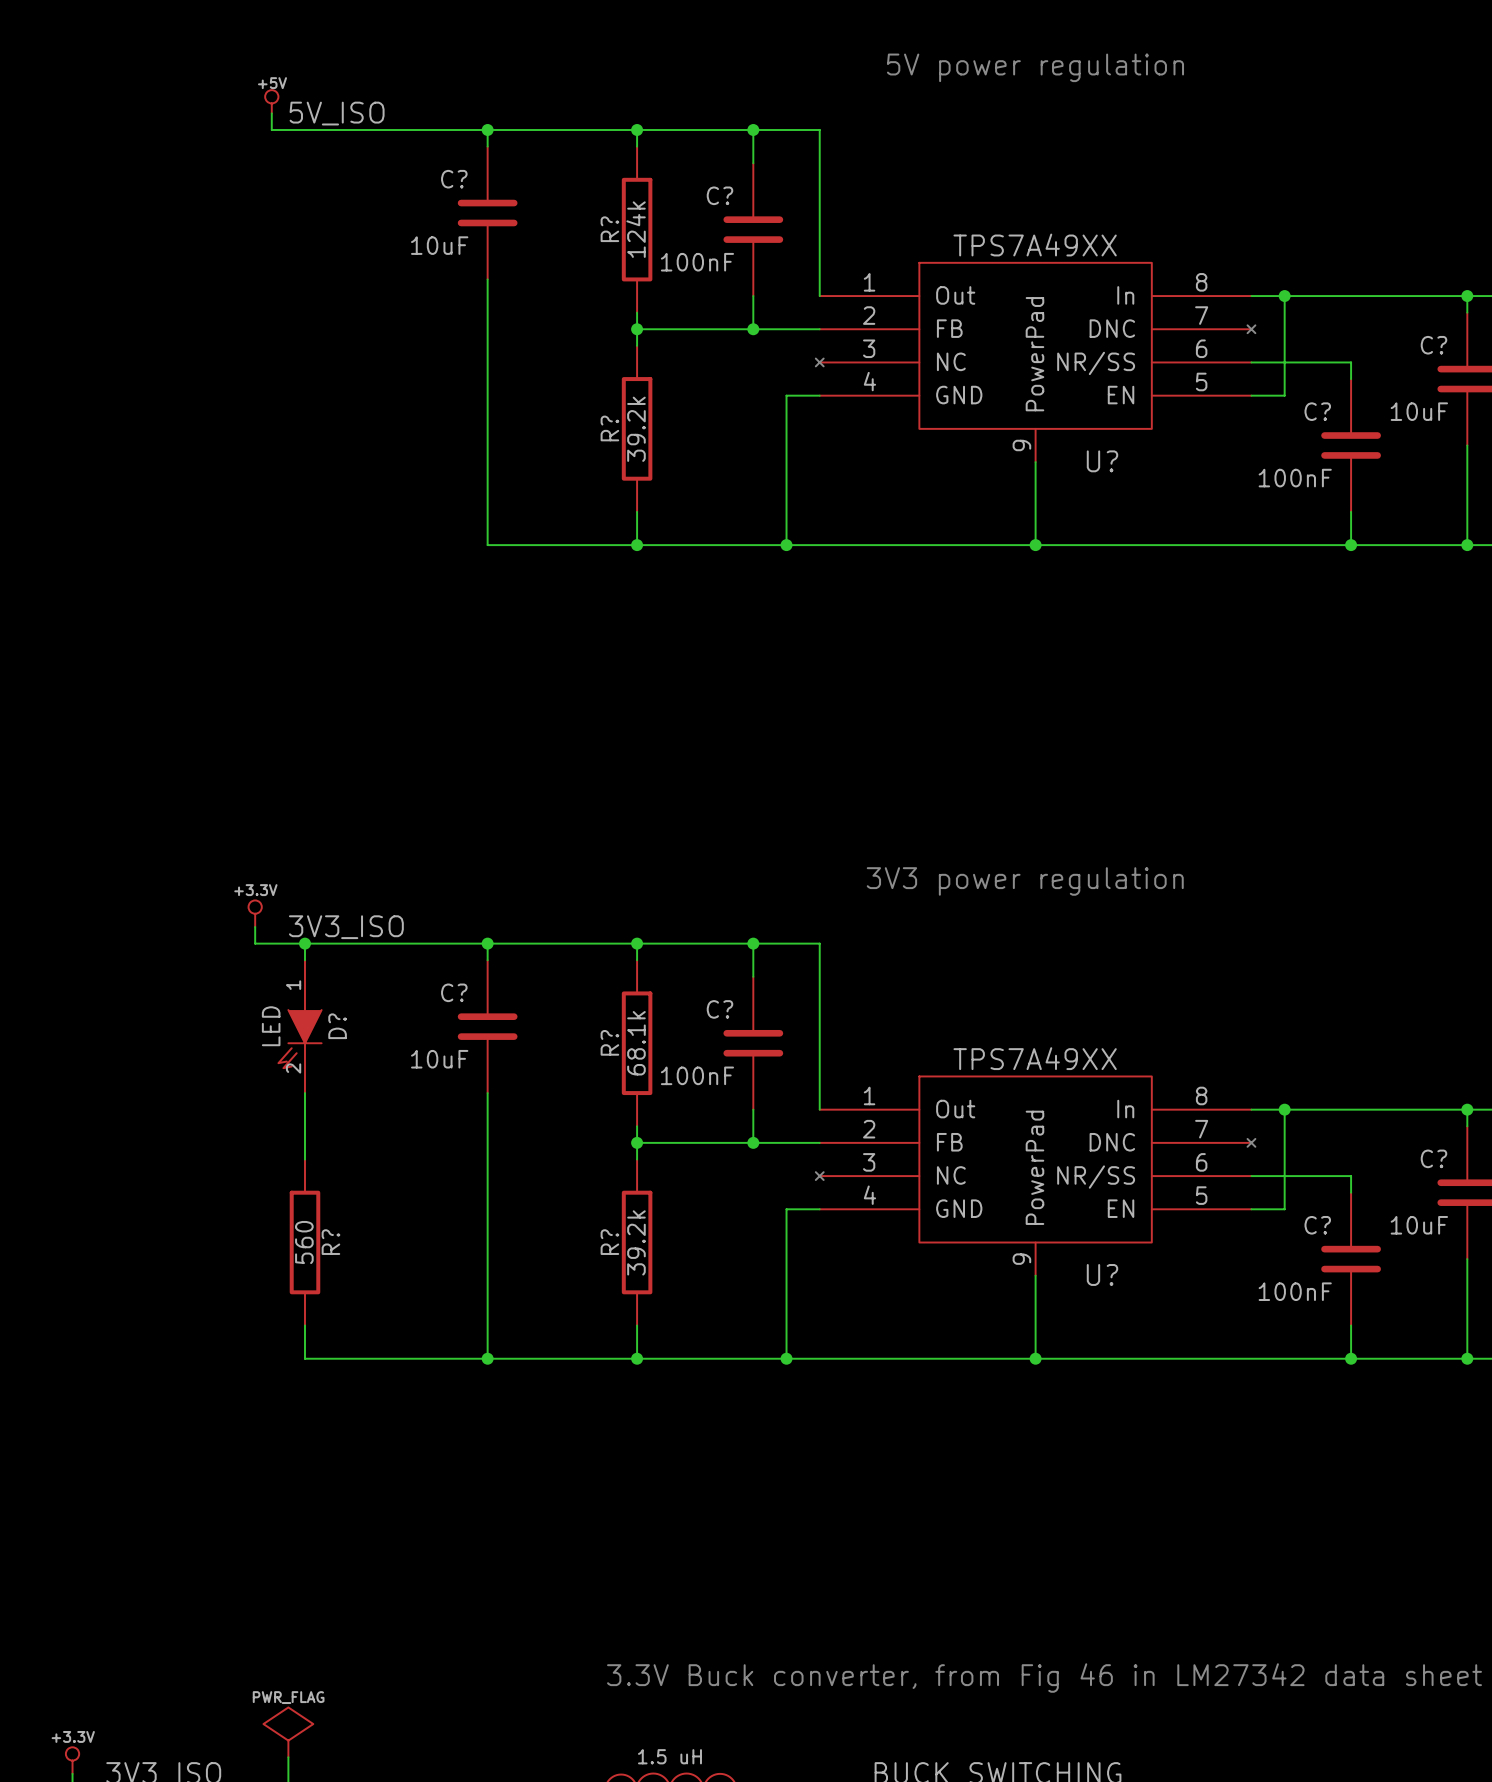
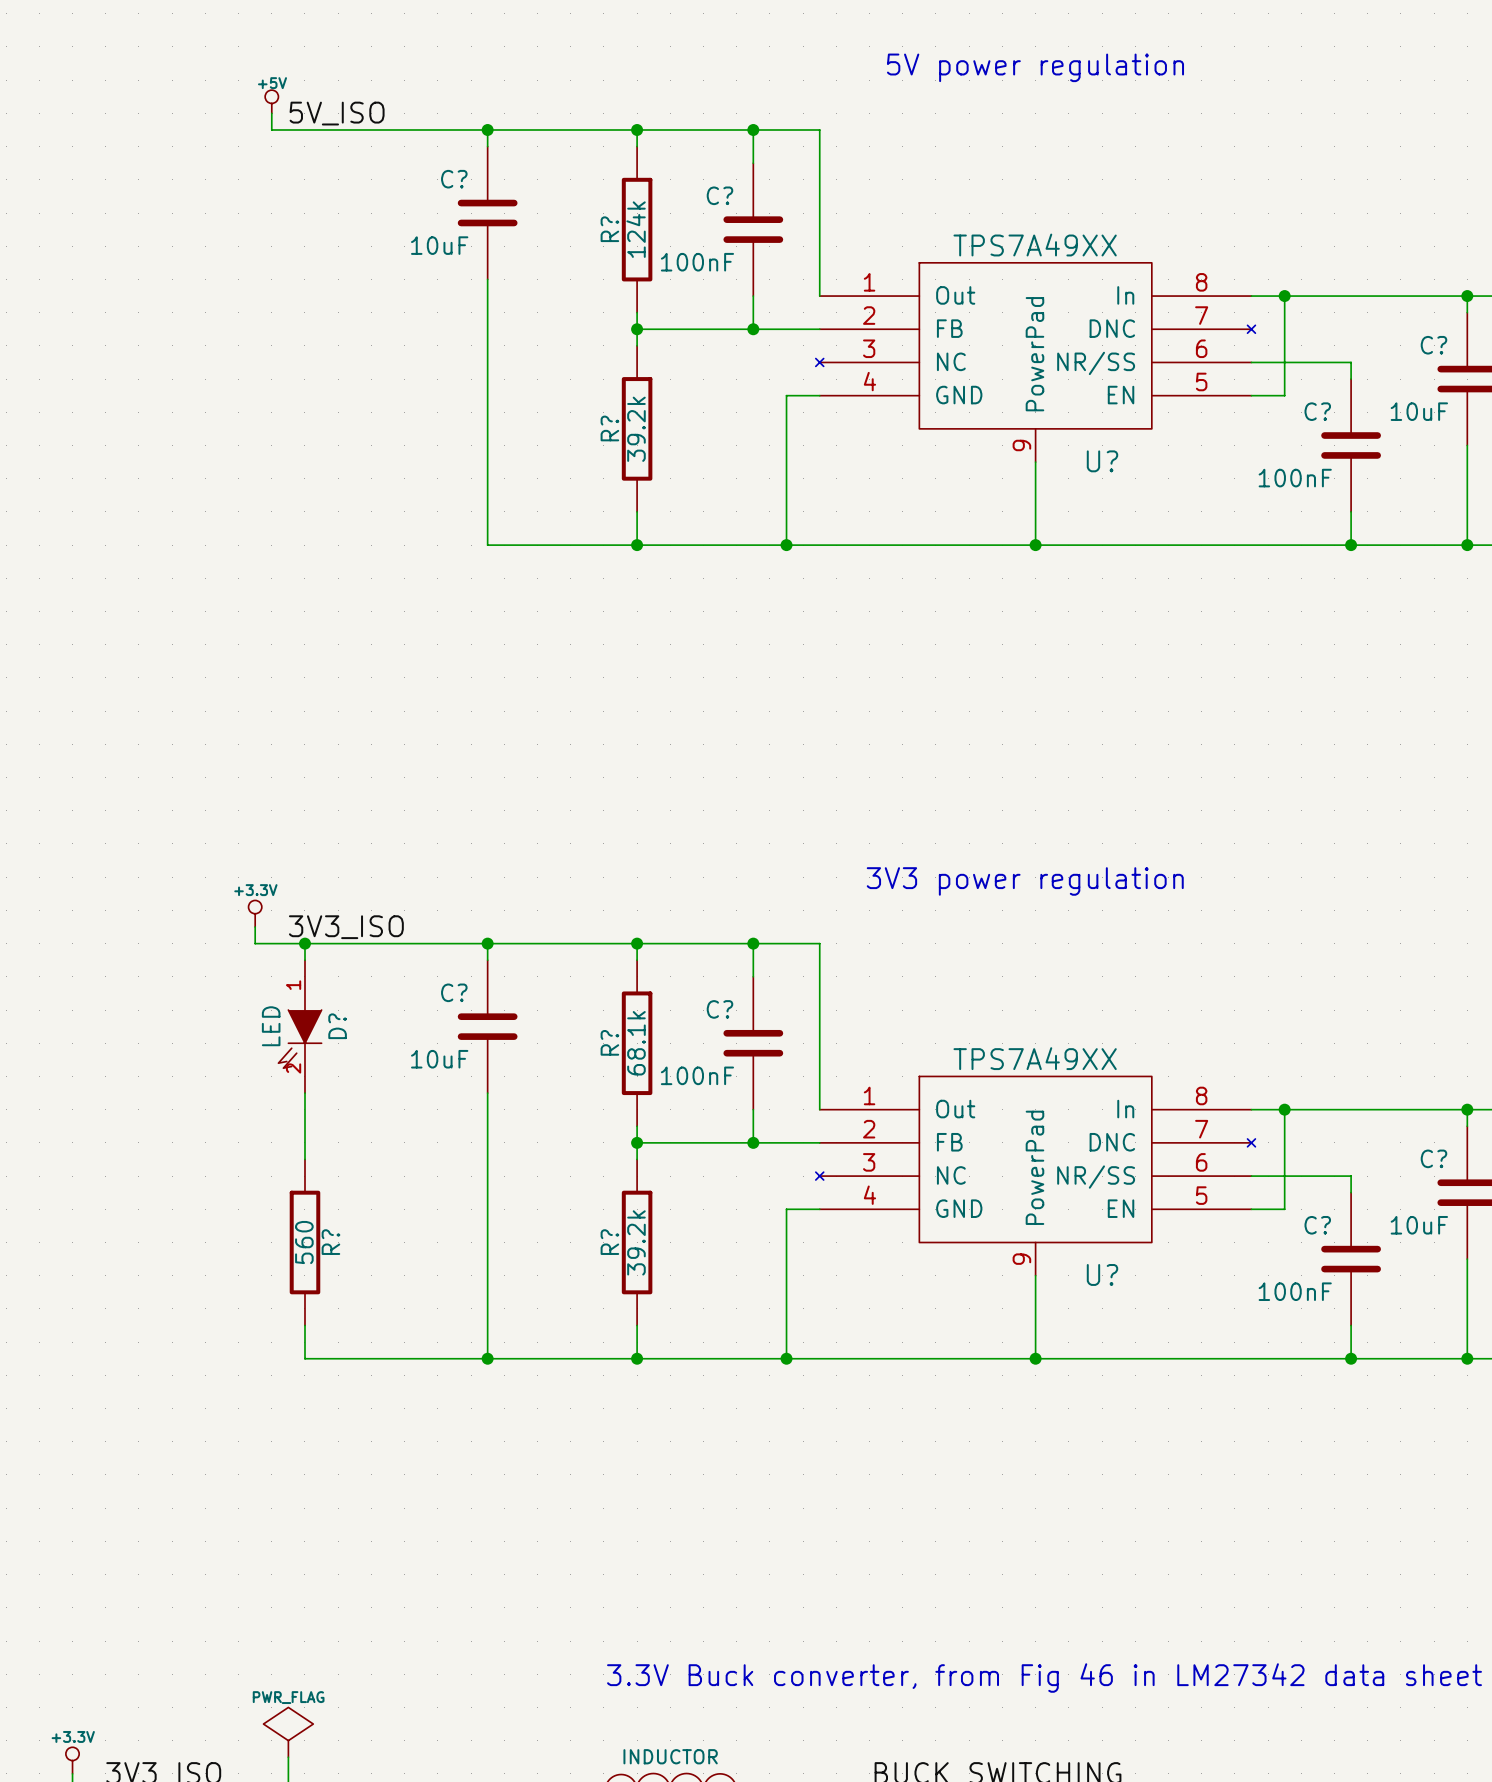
part value: 1.5 uH (669, 1756) -> INDUCTOR (670, 1756)

